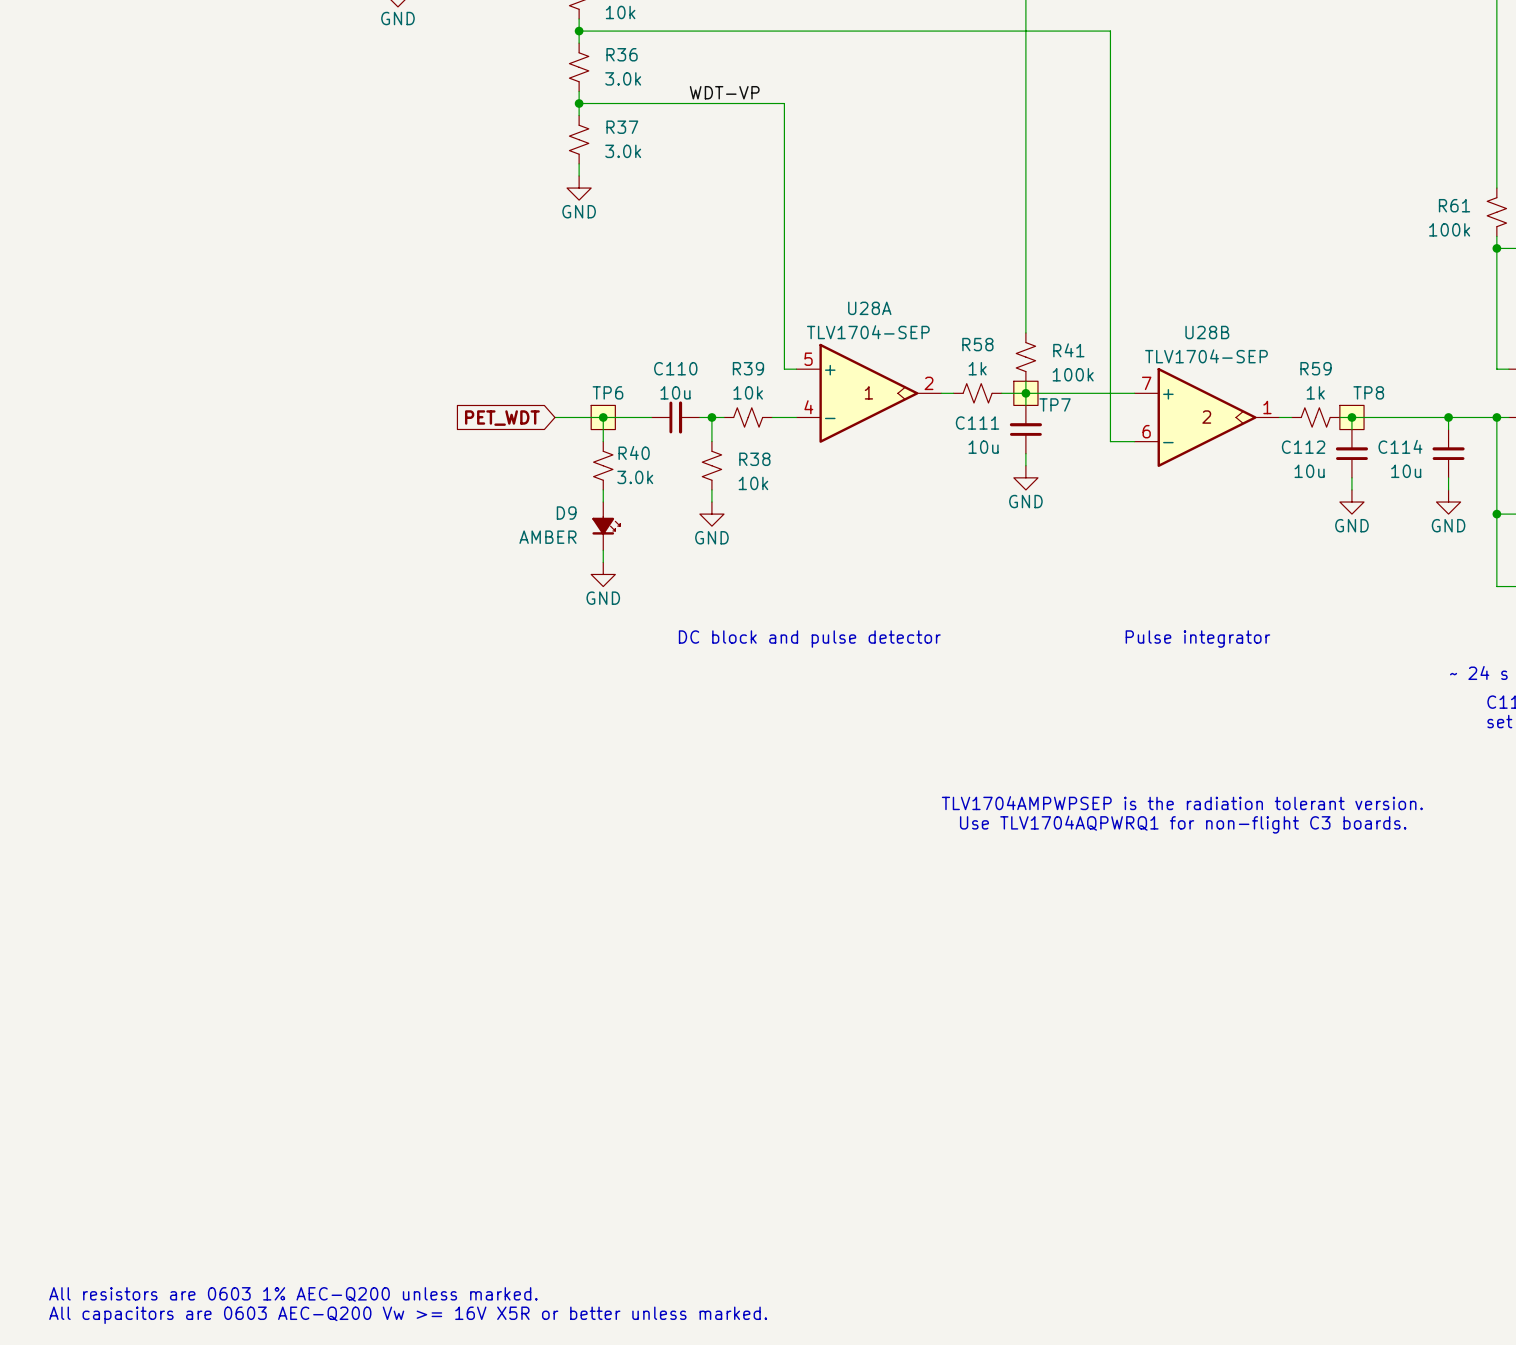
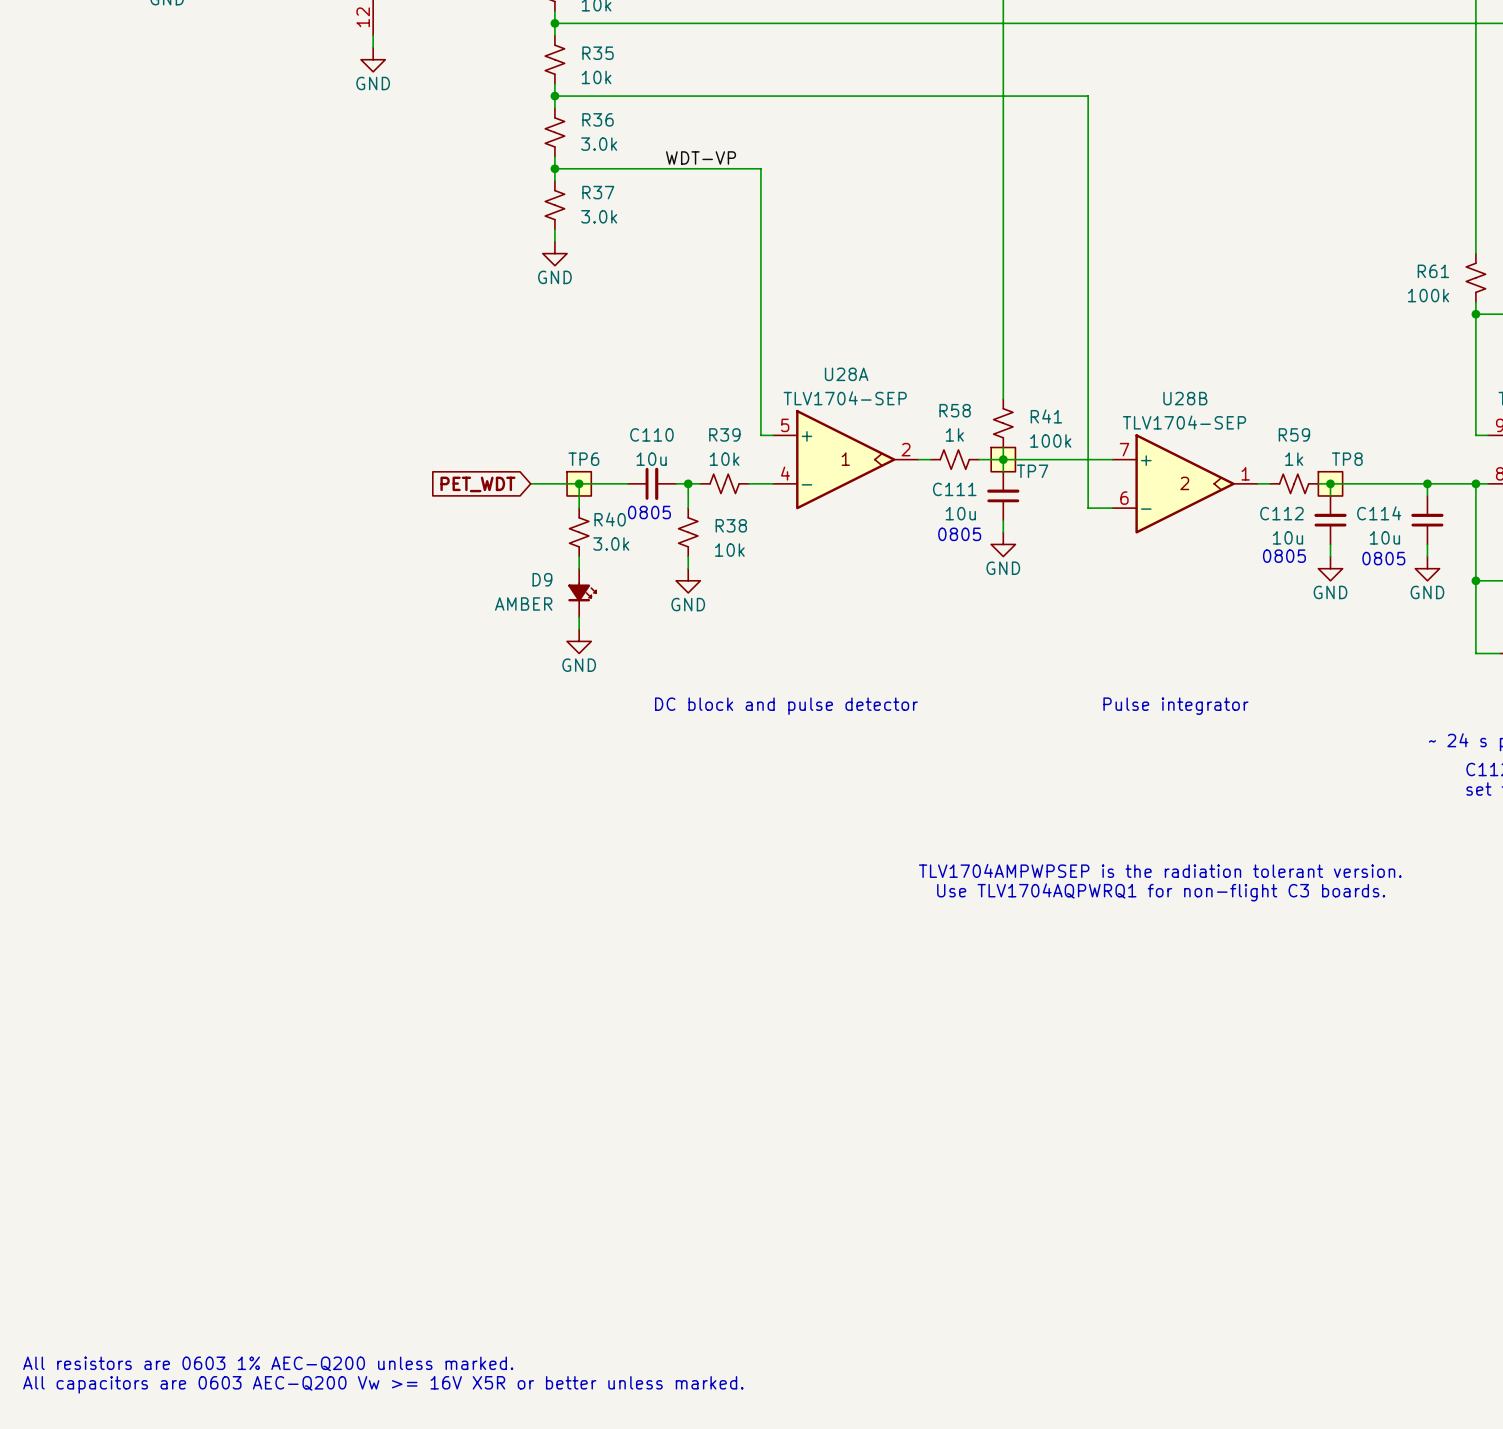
text: none -> 0805 (649, 512)
text: none -> 0805 (959, 534)
text: none -> 0805 (1284, 556)
text: none -> 0805 (1383, 558)

